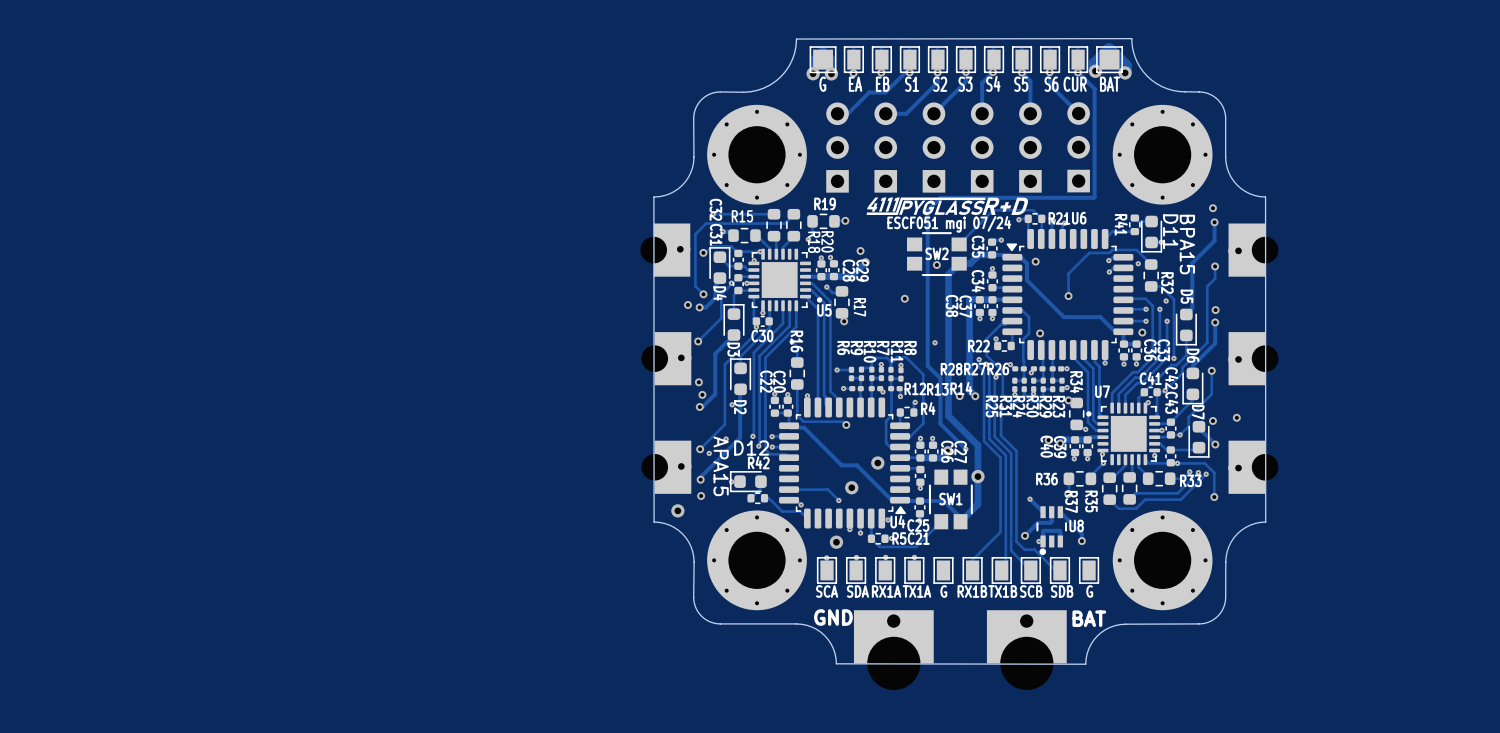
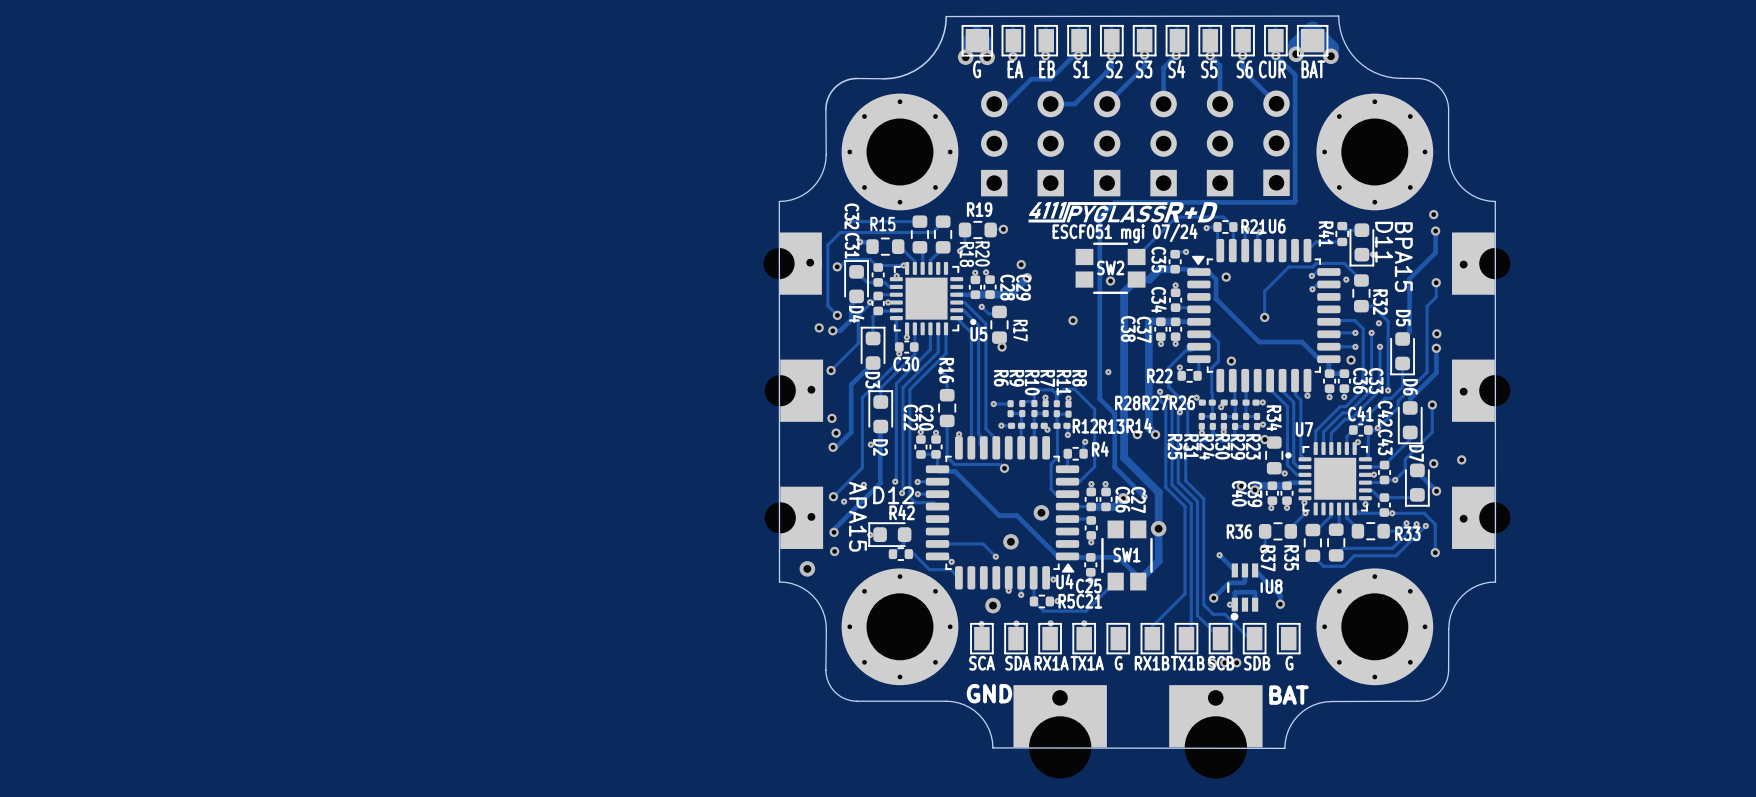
via: none -> (1212, 663)
via: none -> (1224, 662)
via: none -> (1236, 662)

